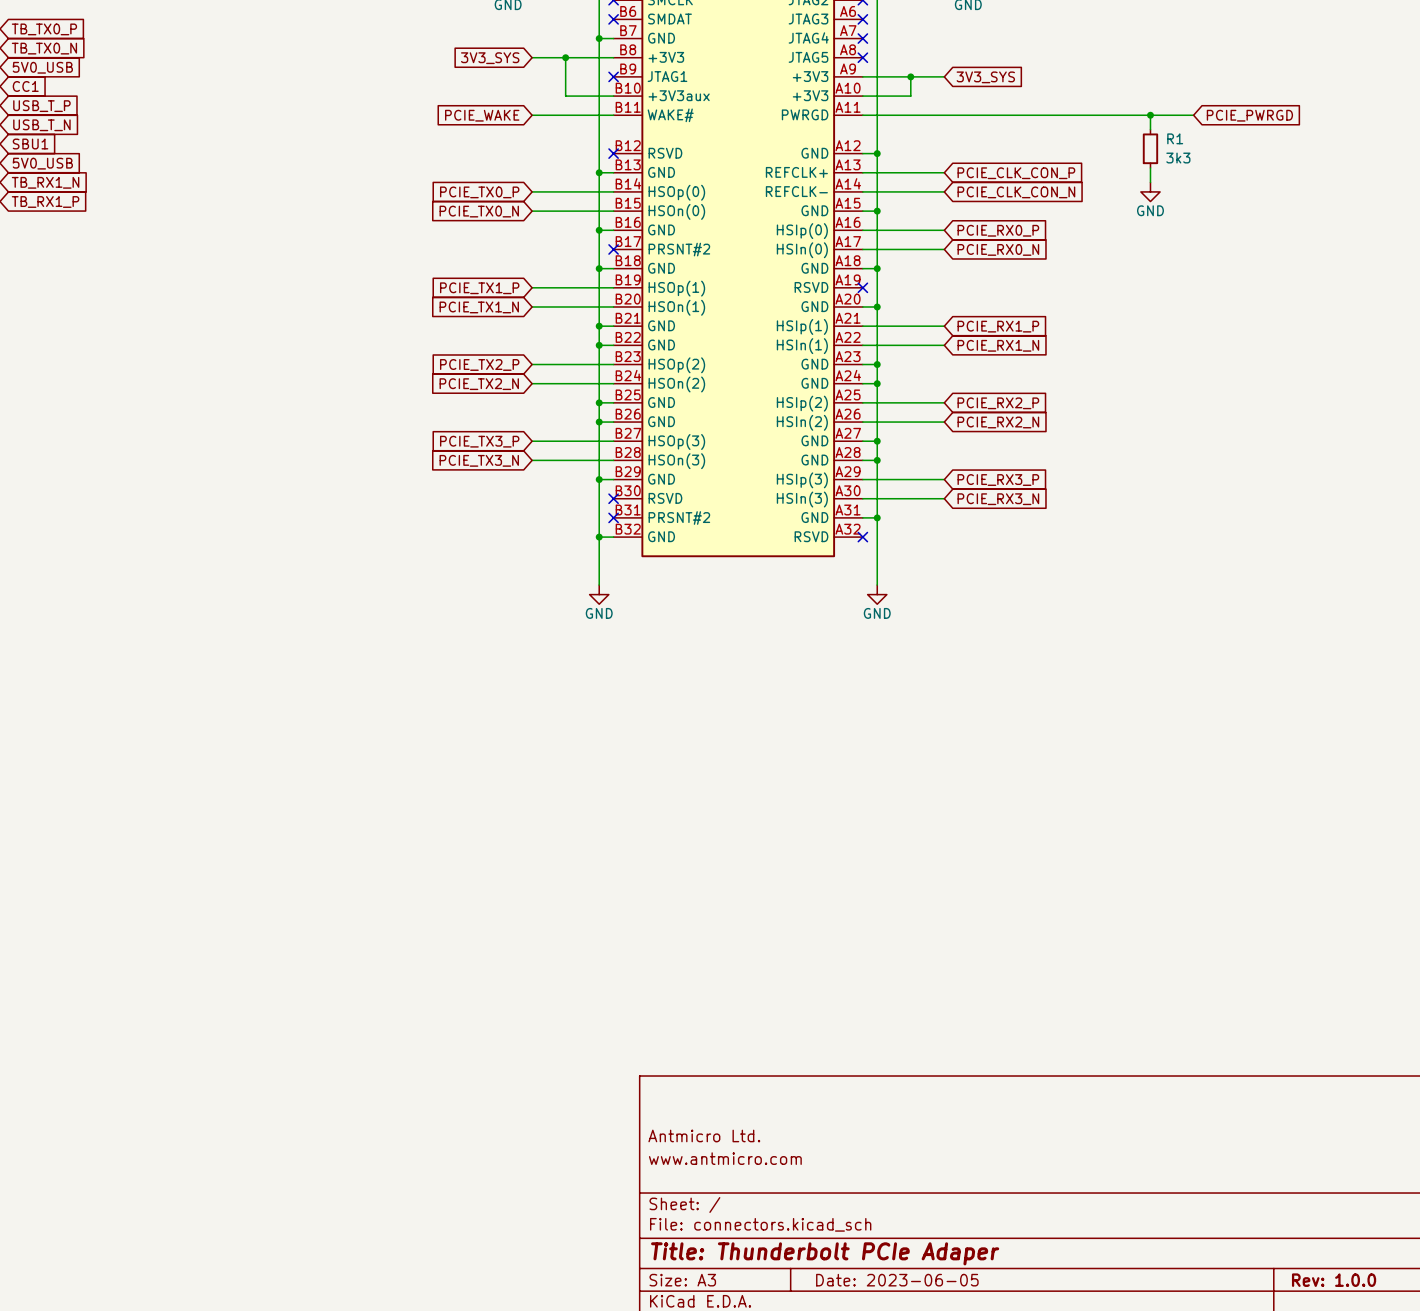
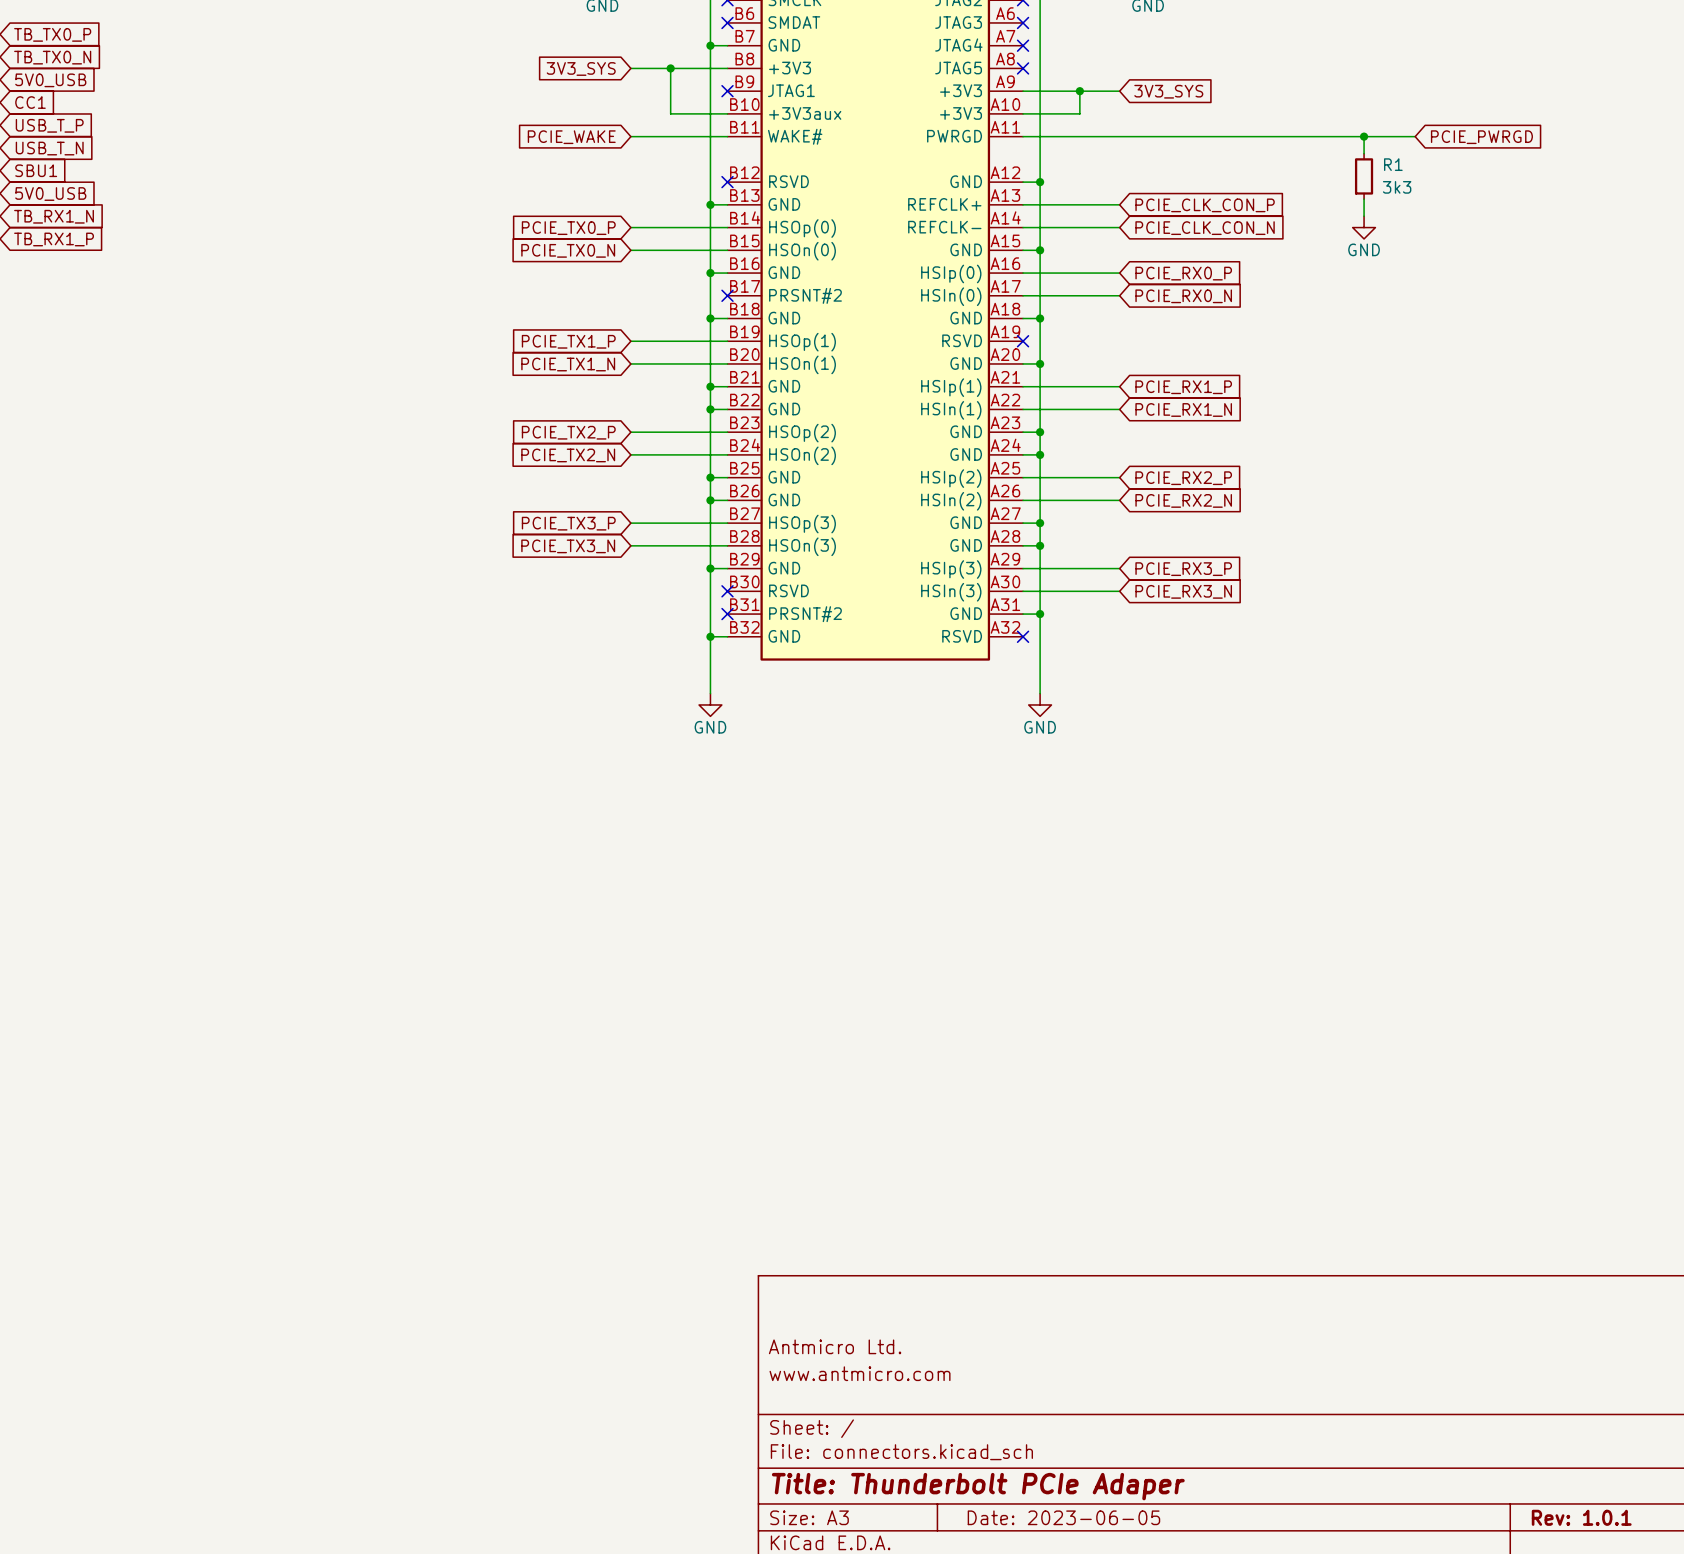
title block: Rev: 1.0.0 (1334, 1280) -> Rev: 1.0.1 (1581, 1517)

